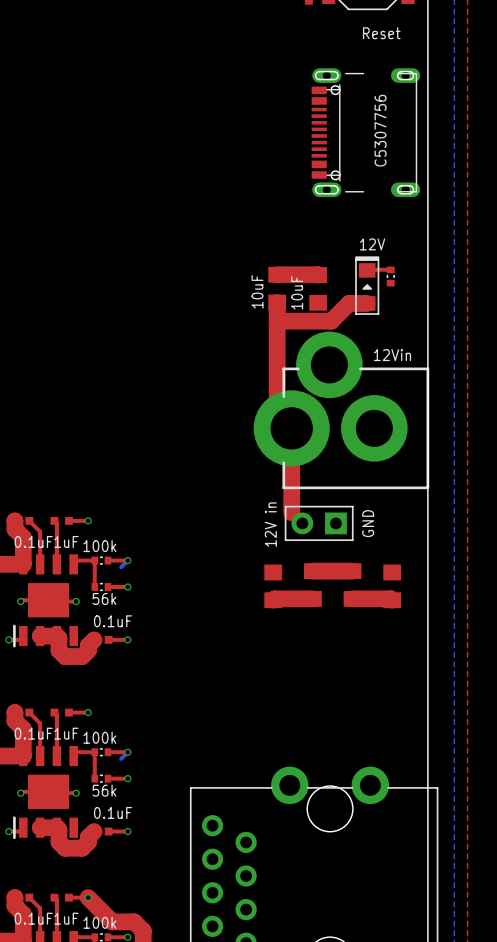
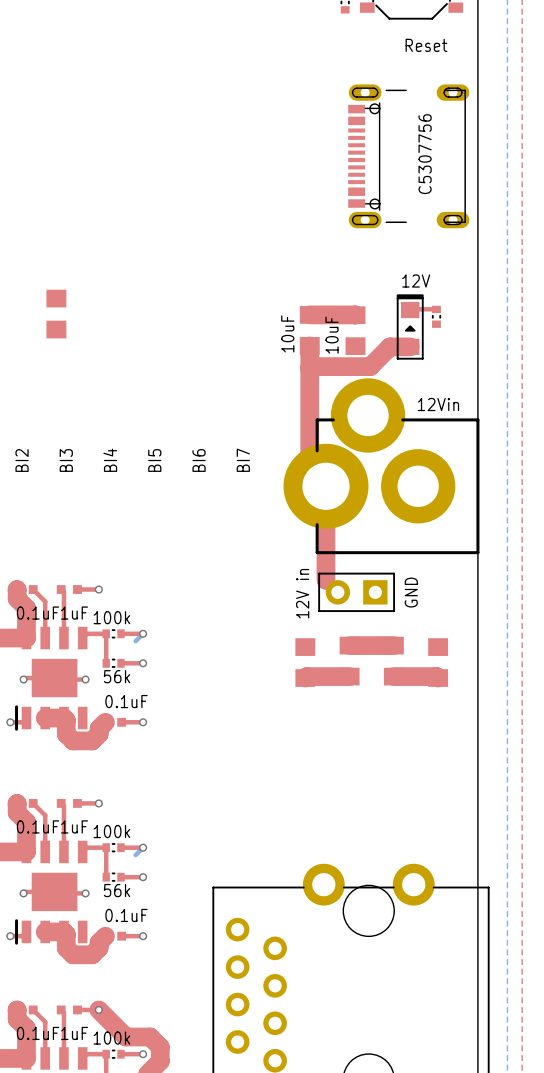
part: none -> (56, 314)
text: none -> BI2 (22, 460)
text: none -> BI3 (66, 460)
text: none -> BI4 (110, 460)
text: none -> BI5 (154, 460)
text: none -> BI6 (199, 460)
text: none -> BI7 (243, 460)

